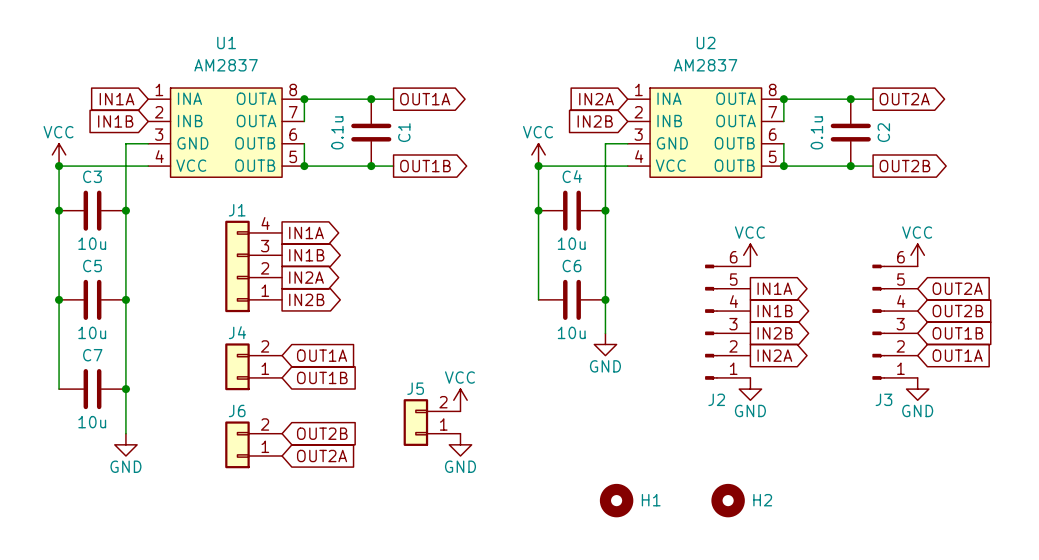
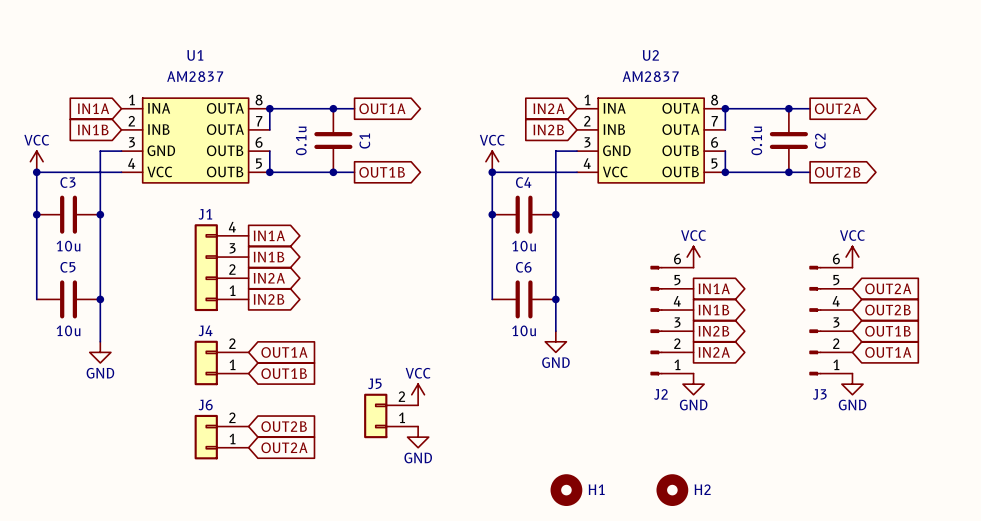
wire: (59, 299) (59, 389) -> none
junction: (59, 299) -> none
wire: (125, 344) (125, 433) -> none
C7: 10u (92, 389) -> none
junction: (125, 389) -> none
power symbol position: GND (125, 444) -> GND (100, 352)

